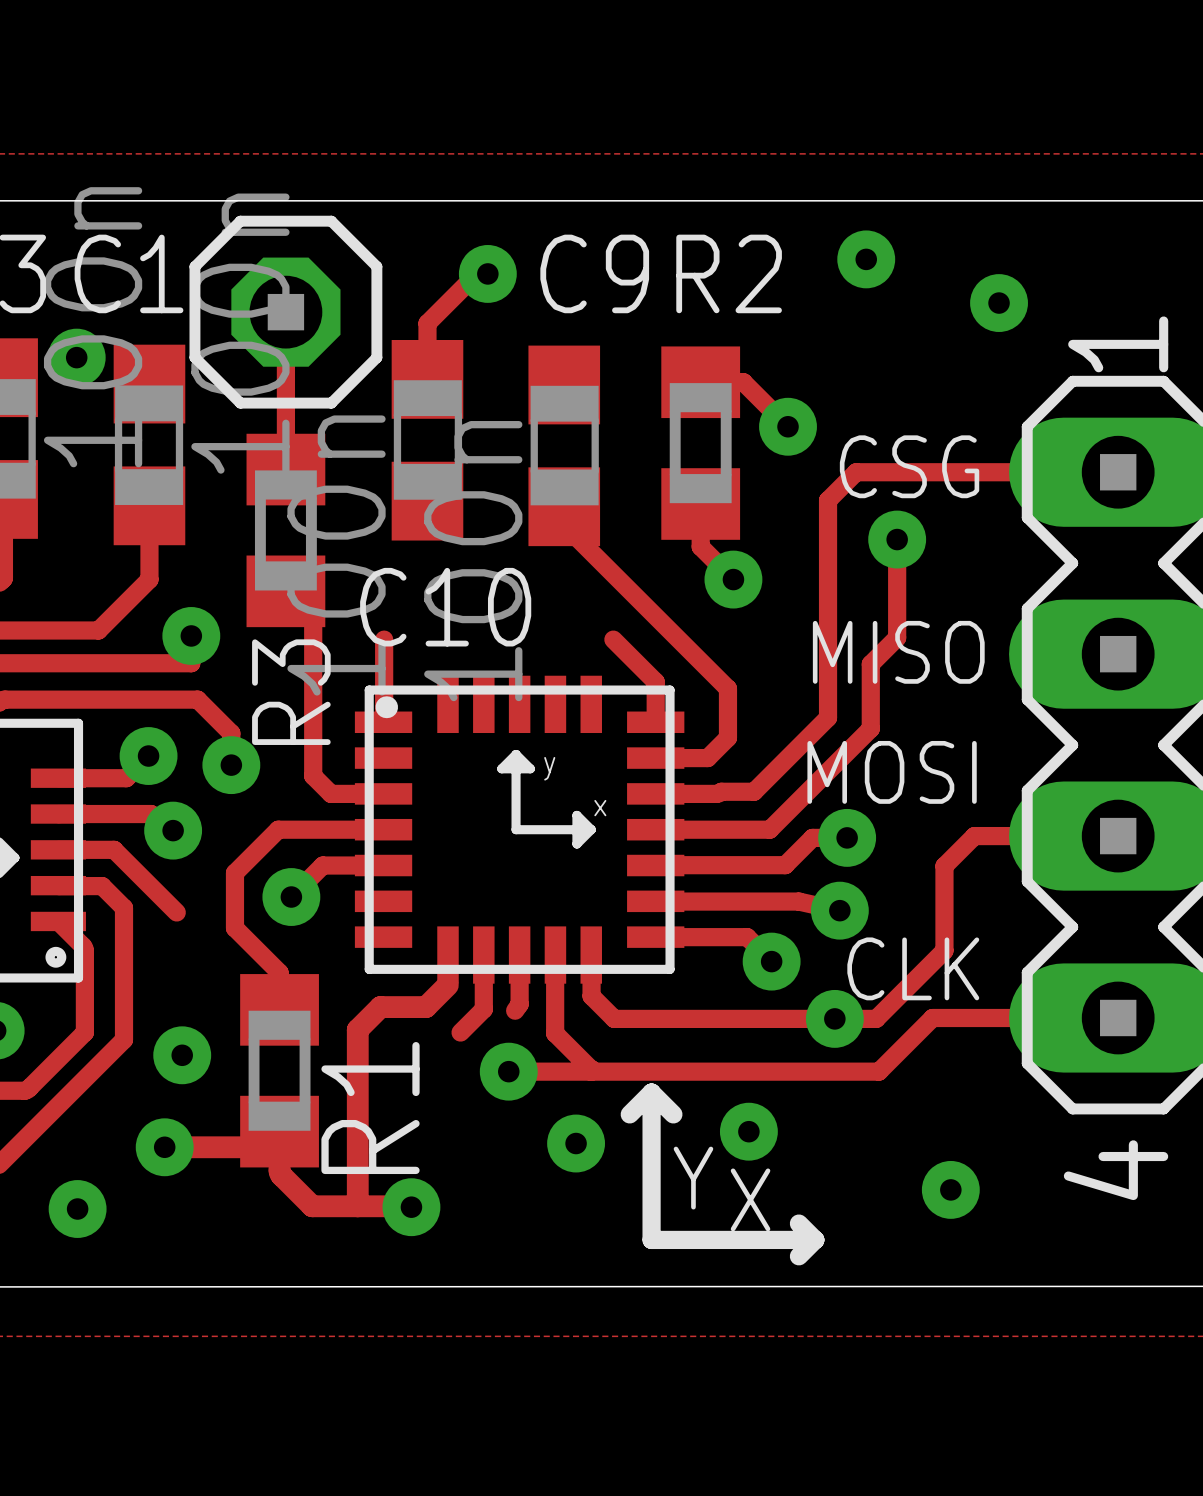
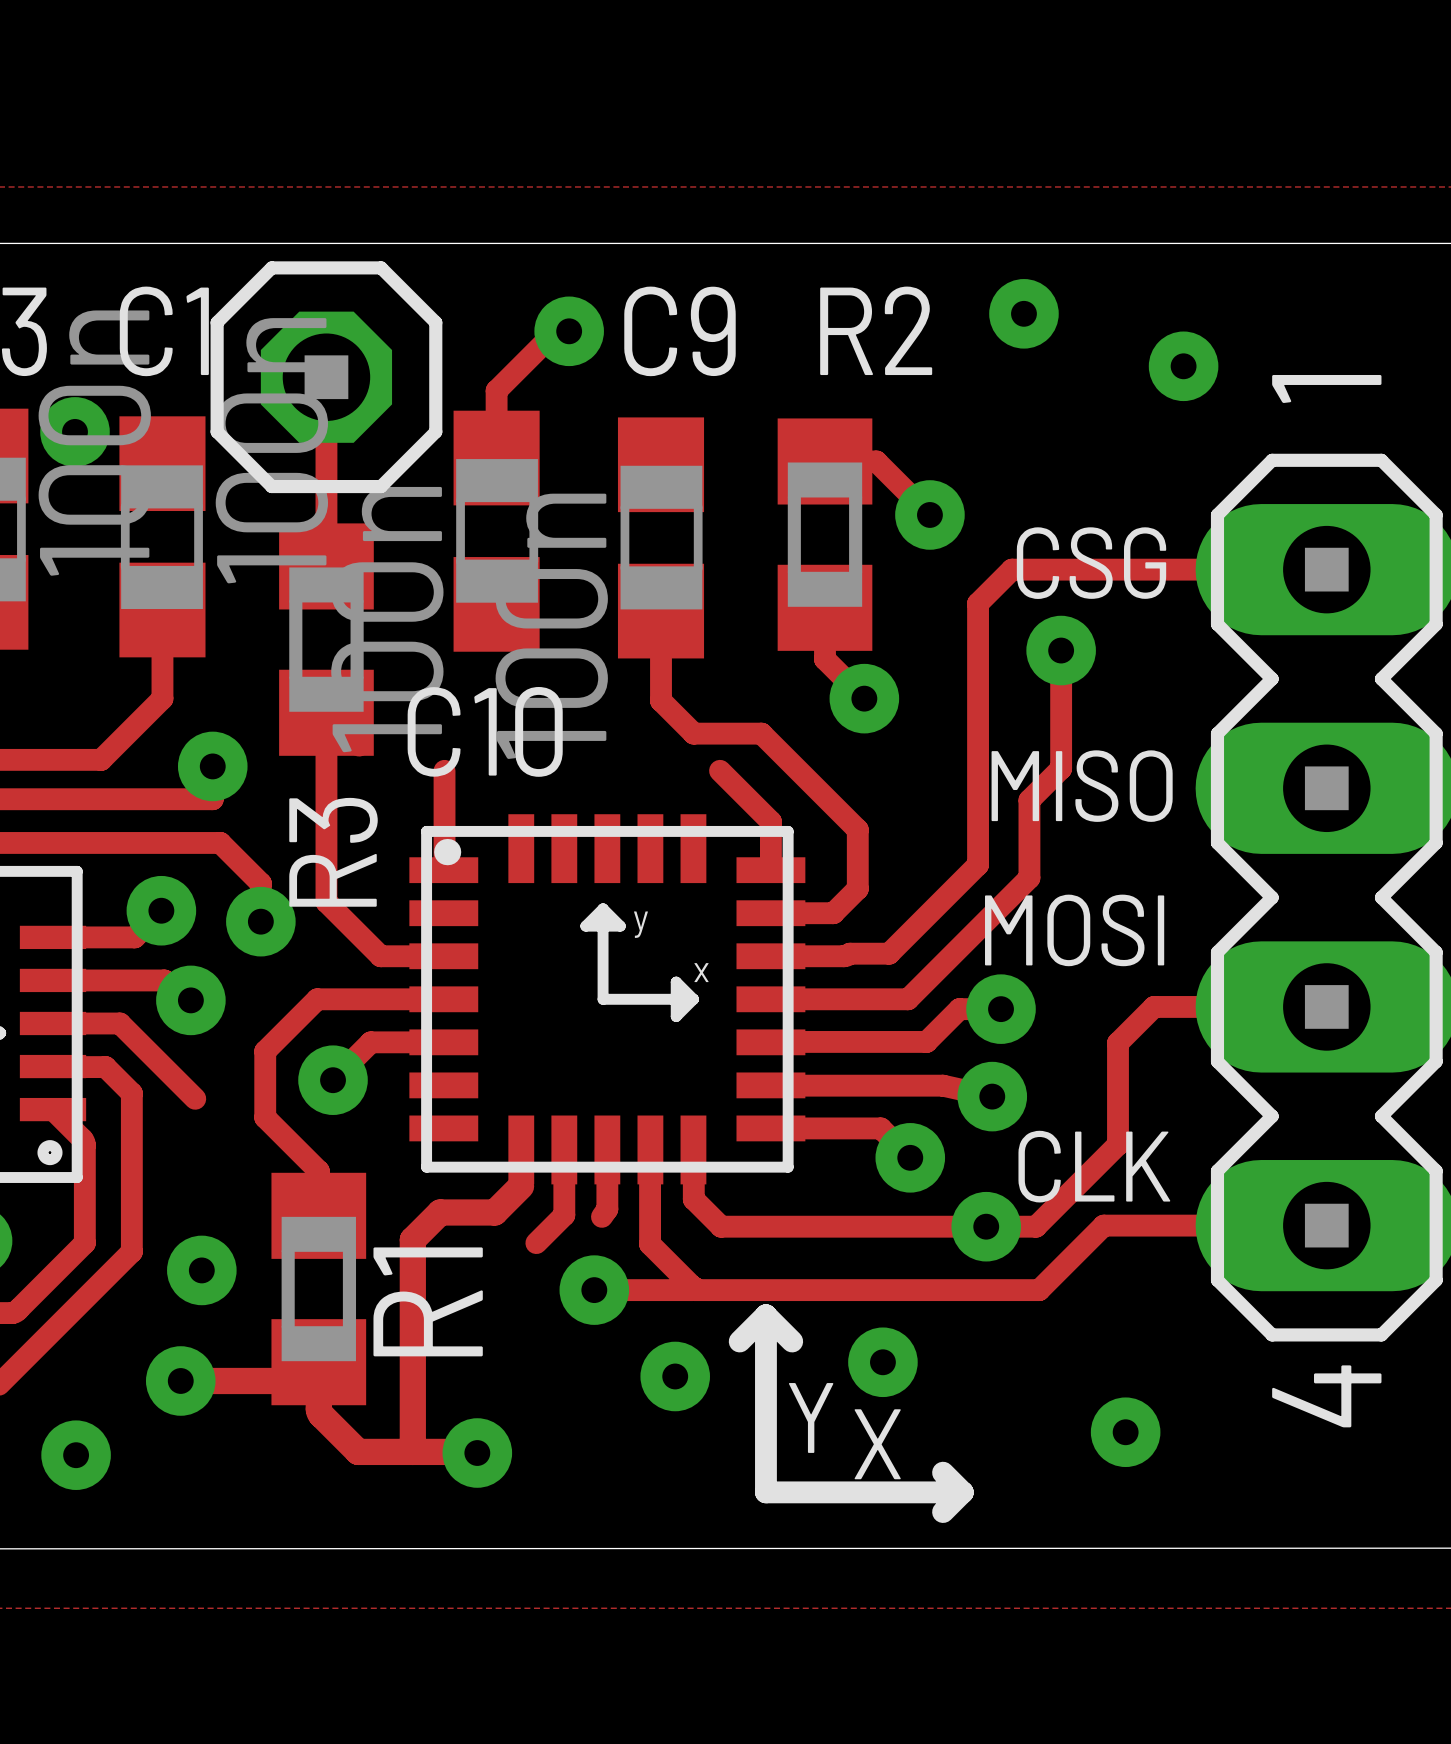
track: (564, 524) (647, 608) -> (661, 633) (661, 700) (693, 733) (761, 733)
track: (313, 618) (313, 776) -> (326, 712) (326, 901) (359, 934)

